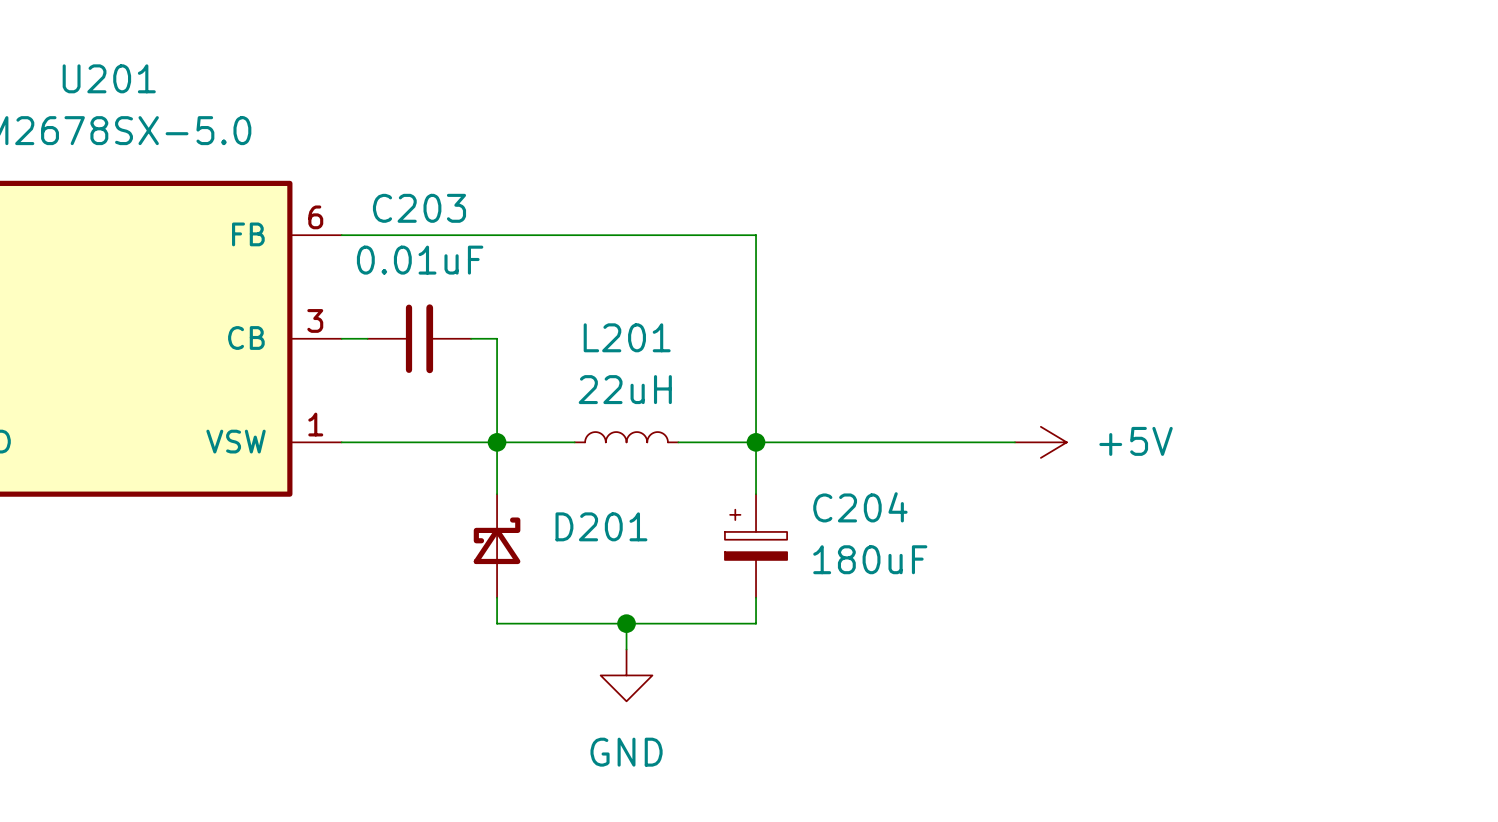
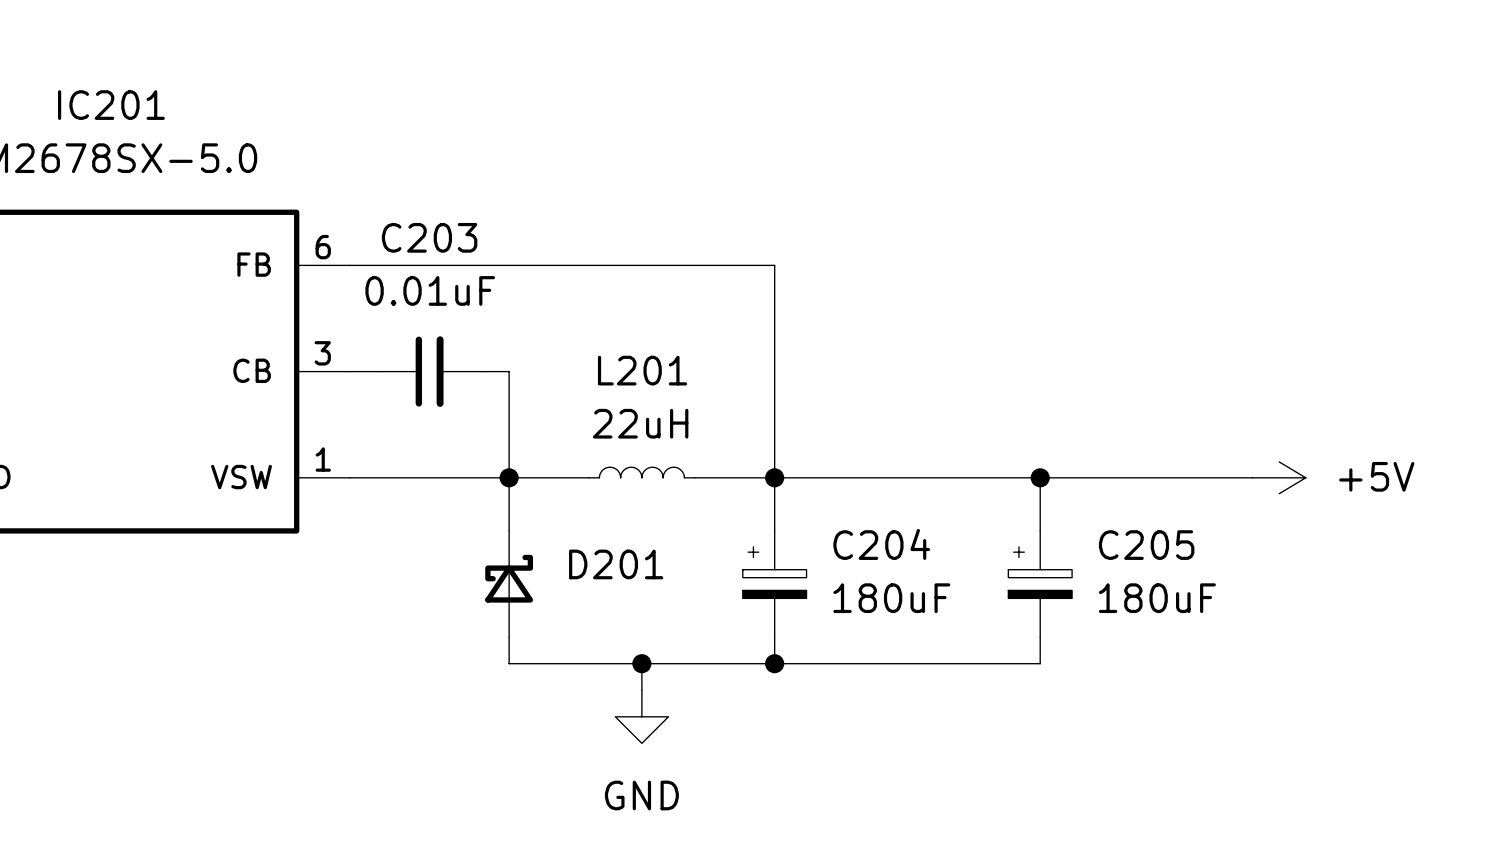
U201 name: U201 (109, 78) -> IC201 (111, 105)
junction: none -> (1040, 477)
power symbol position: +5V (1040, 442) -> +5V (1279, 477)
wire: none -> (1252, 477) (1040, 477) (1040, 530)
C205: none -> 180uF (1040, 584)
wire: none -> (1040, 637) (1040, 663) (774, 663)
junction: none -> (774, 663)

